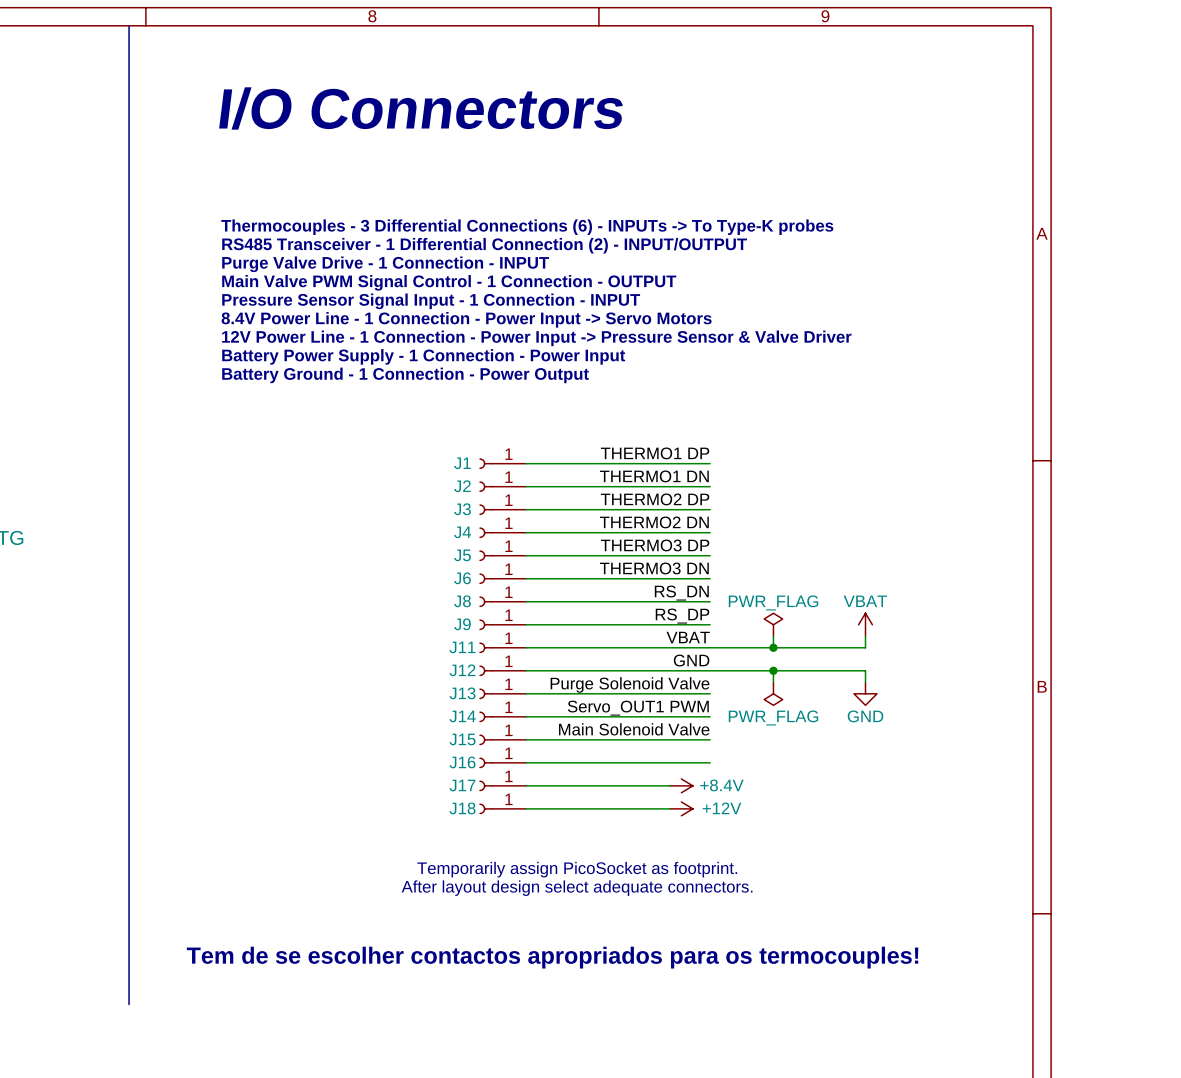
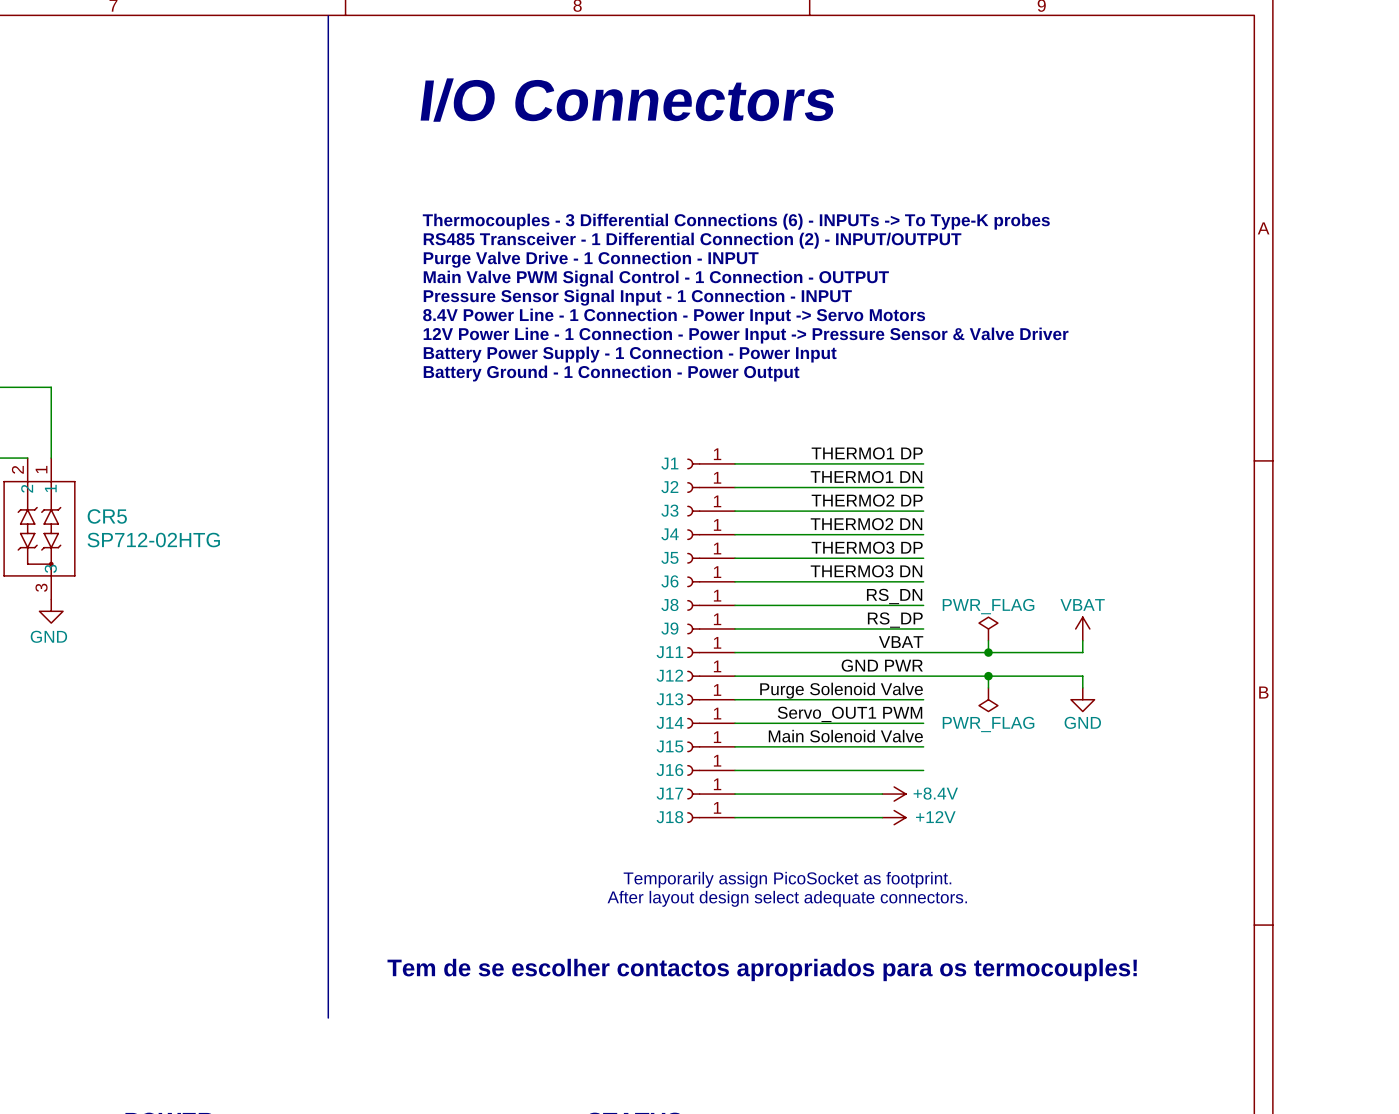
label: GND (691, 660) -> GND PWR (882, 665)

